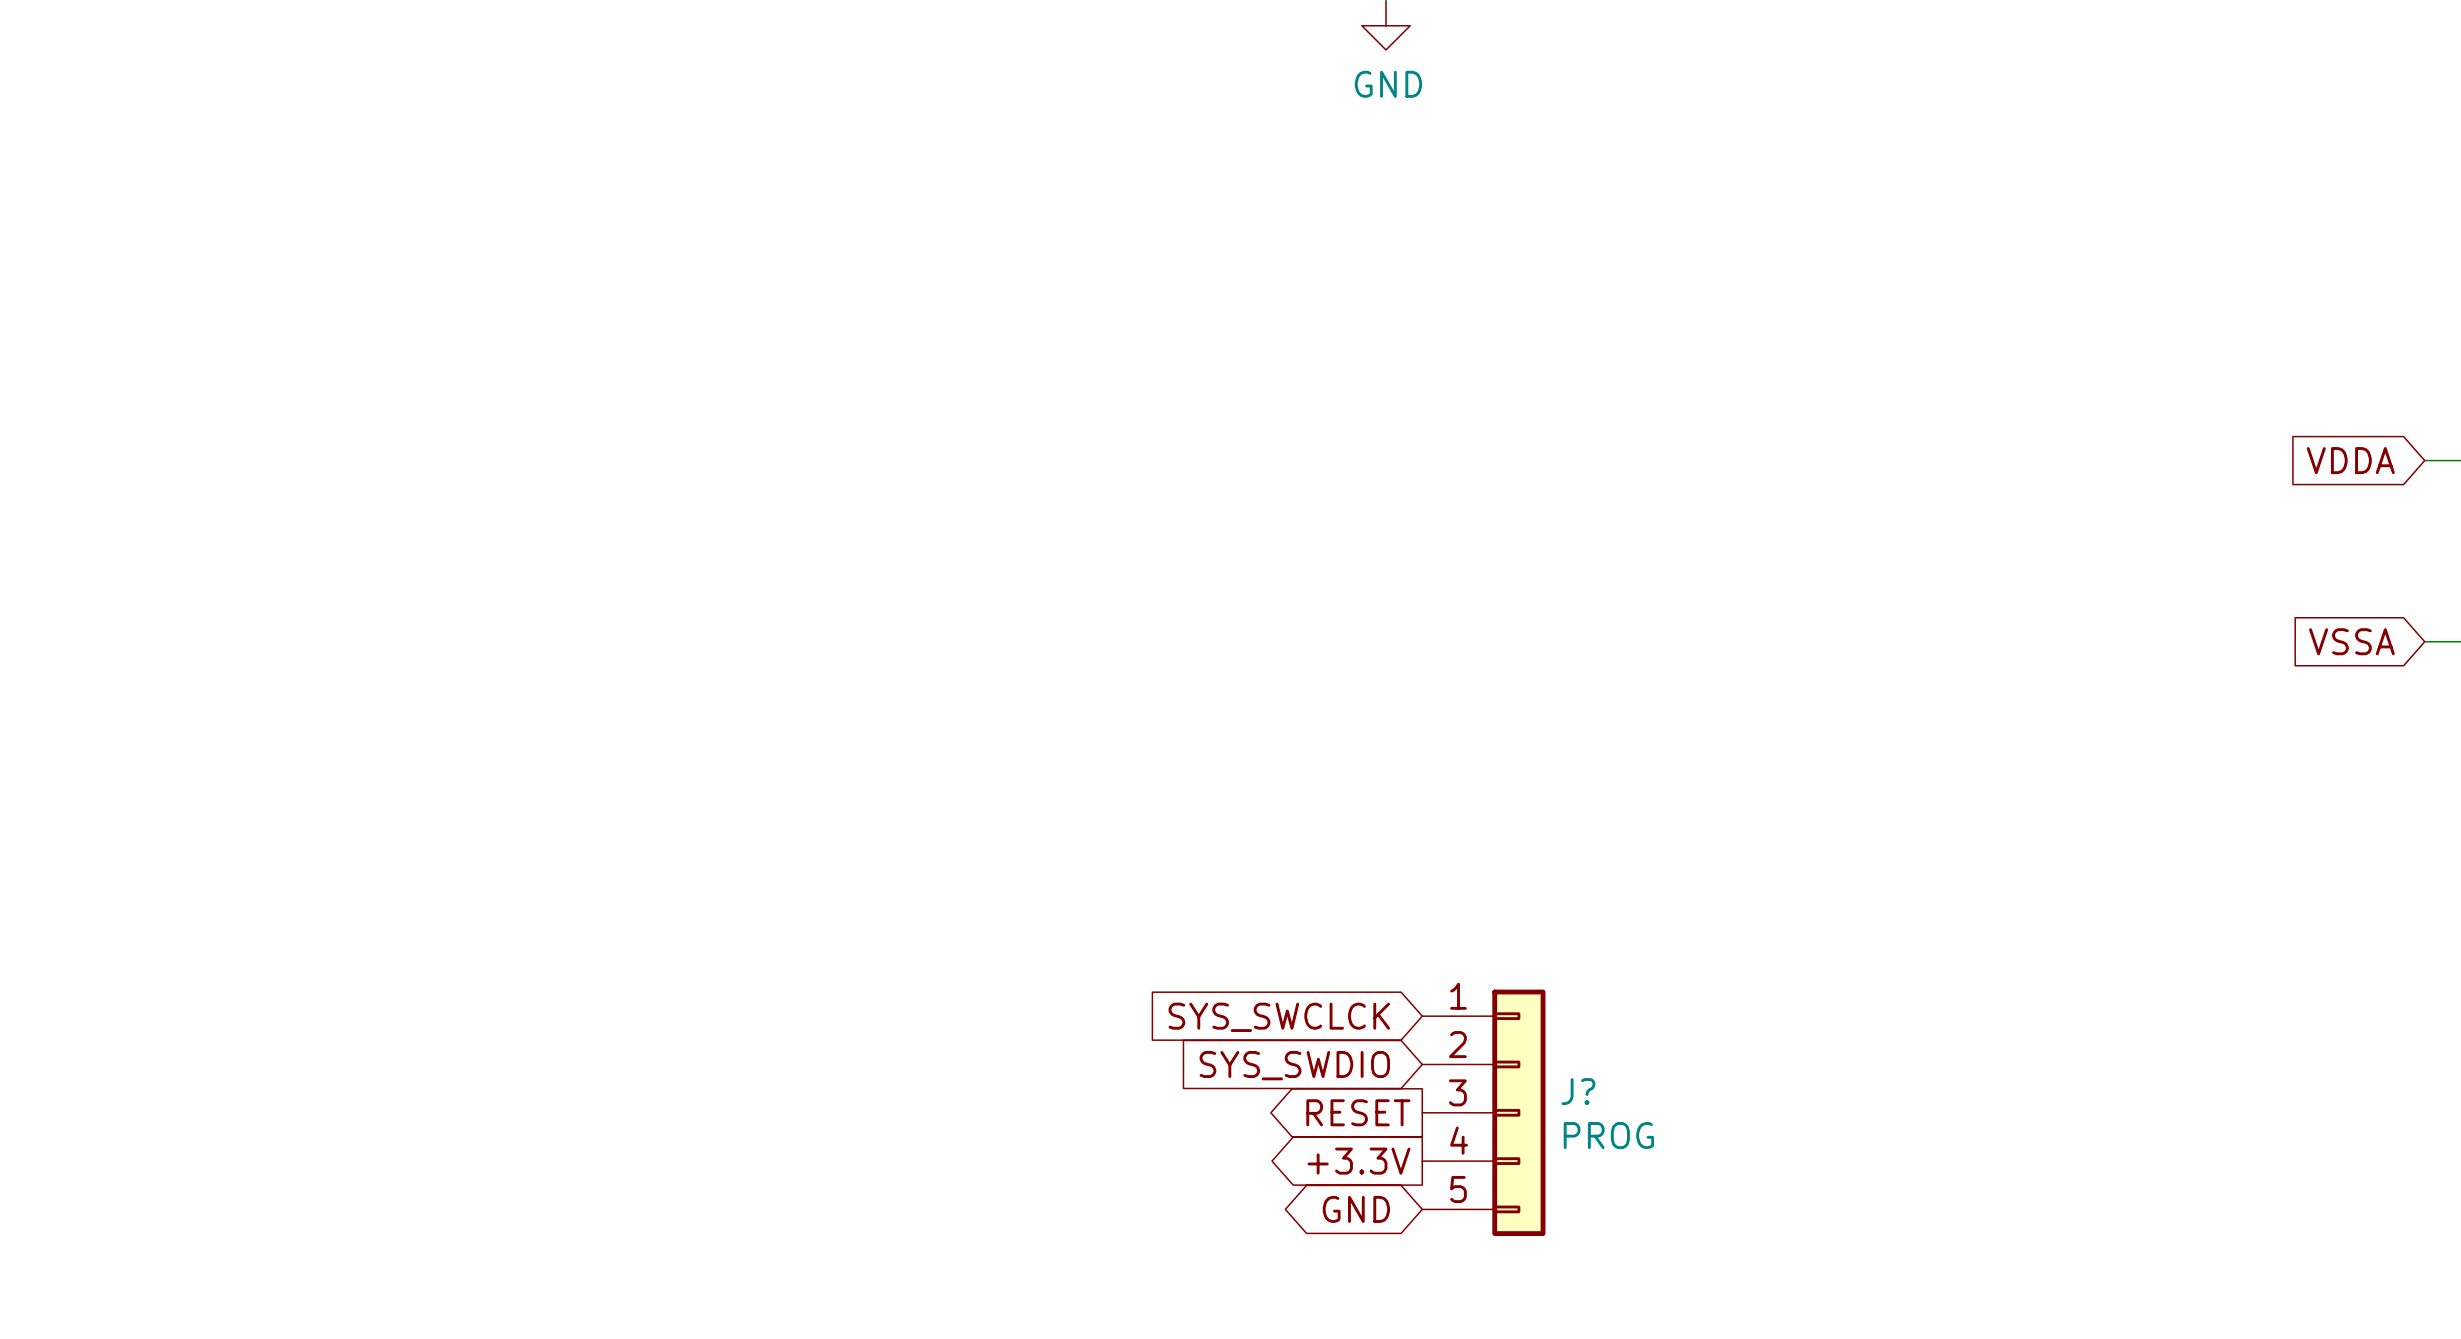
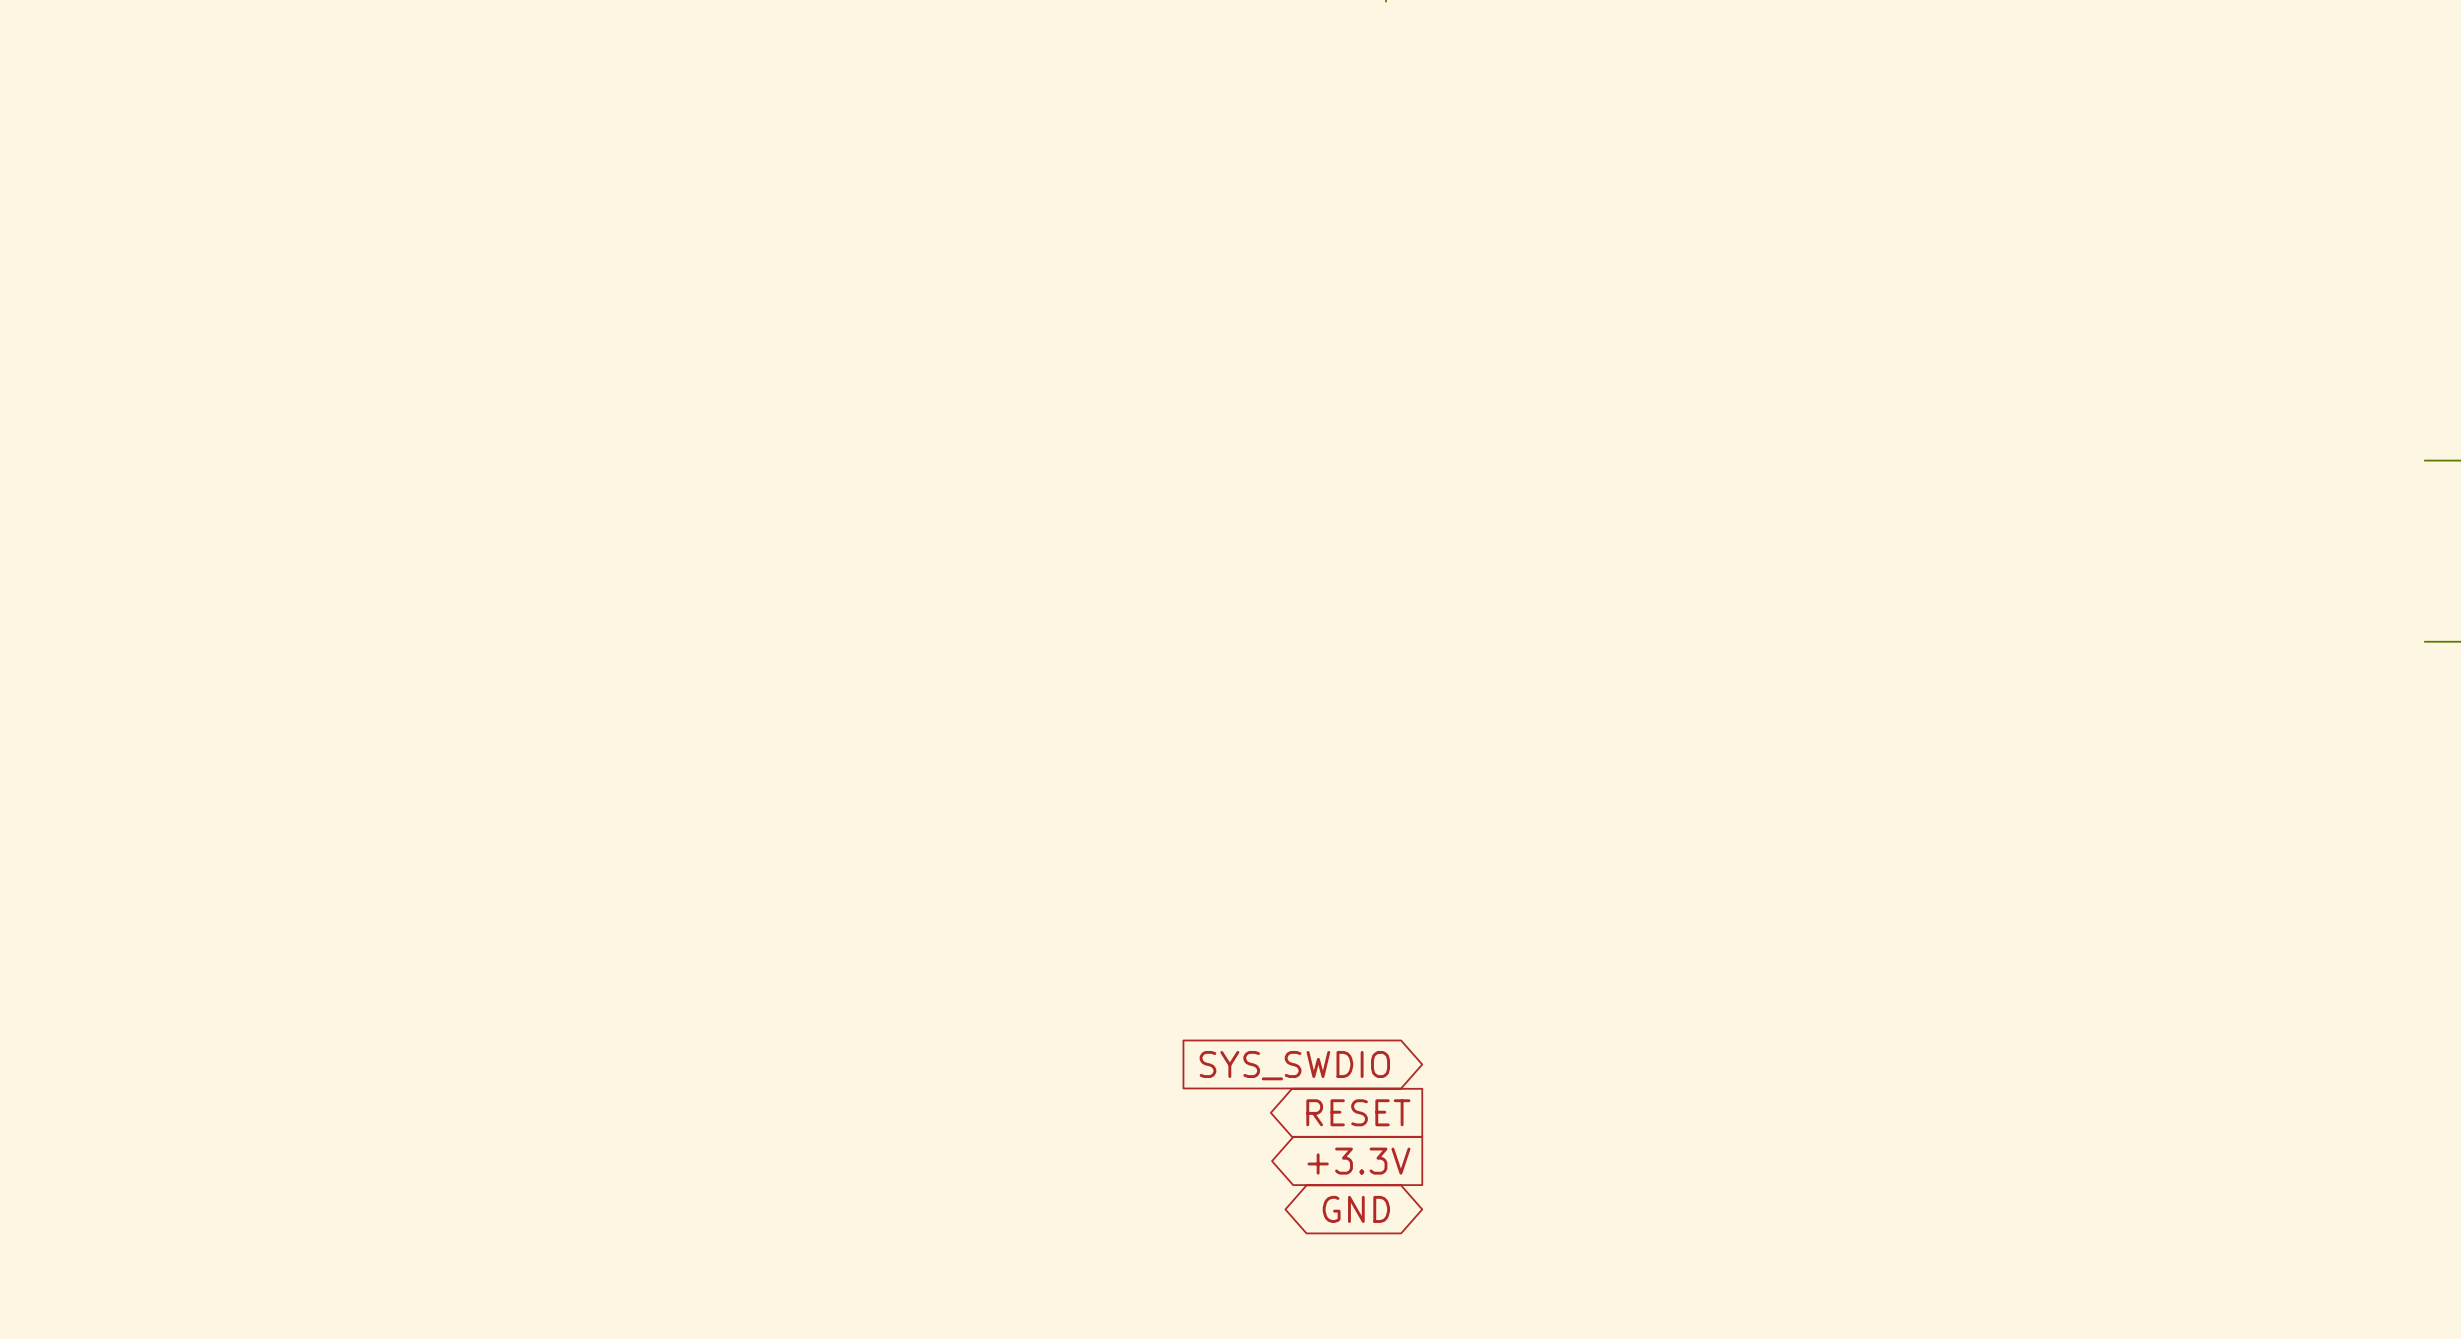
power symbol: GND (1386, 25) -> none
global label: VDDA (2350, 460) -> none
global label: VSSA (2351, 641) -> none
global label: SYS_SWCLCK (1279, 1017) -> none
J?: PROG (1483, 1112) -> none

